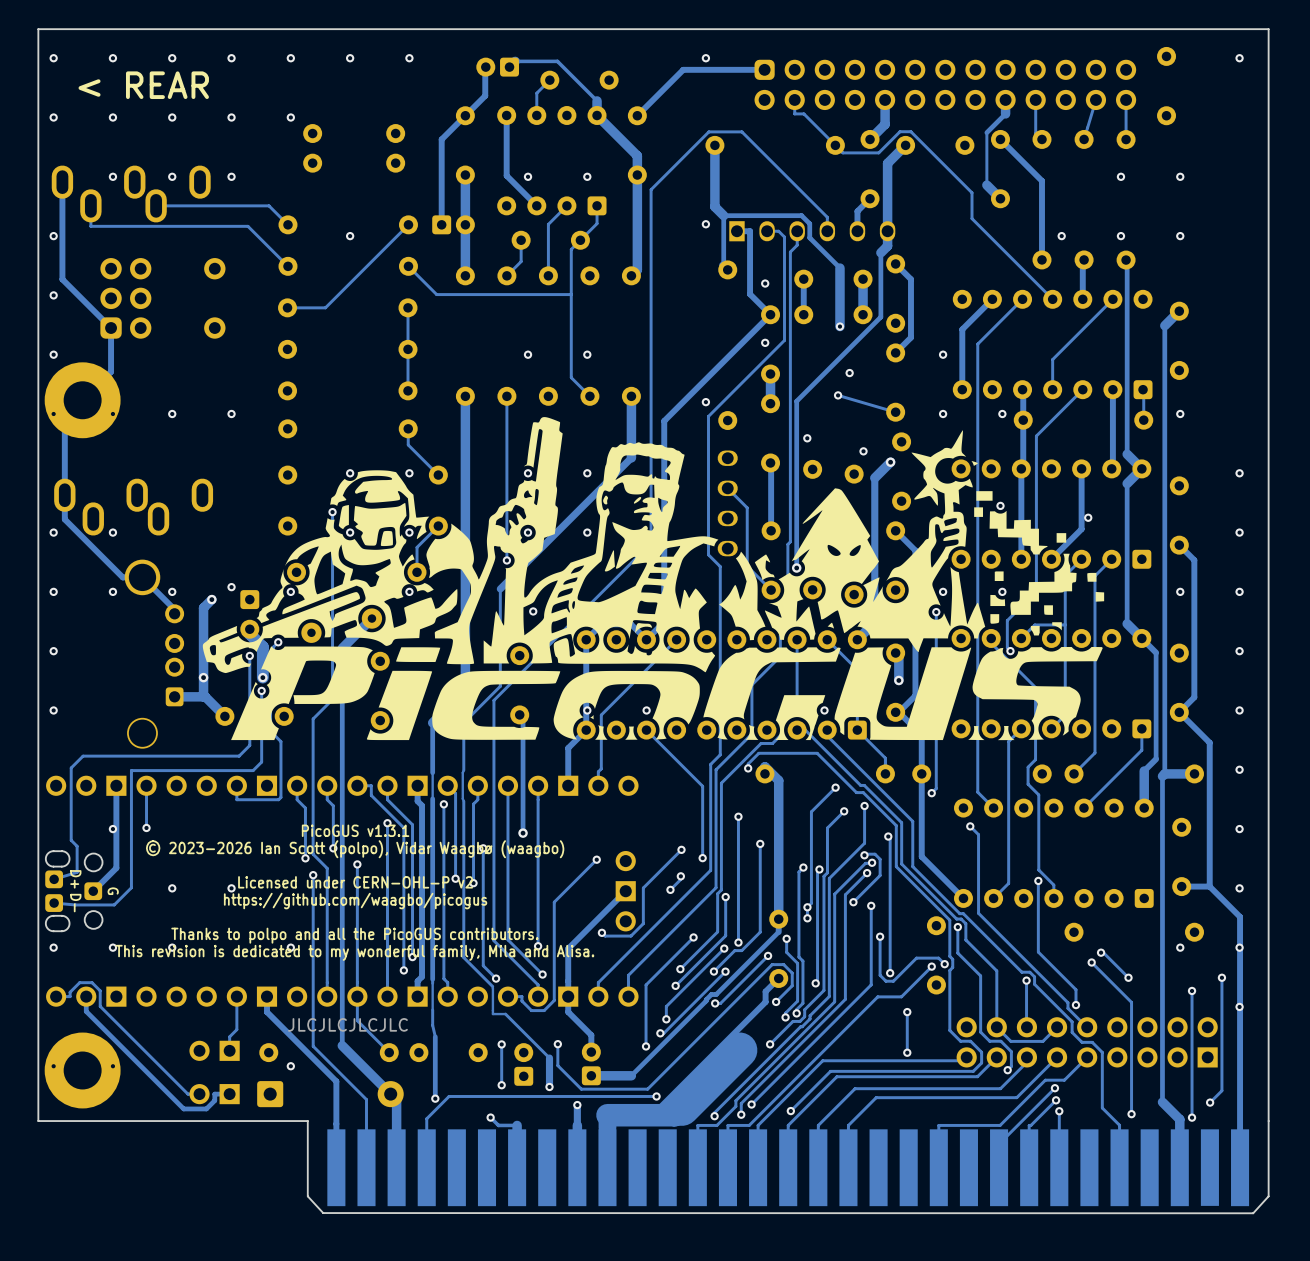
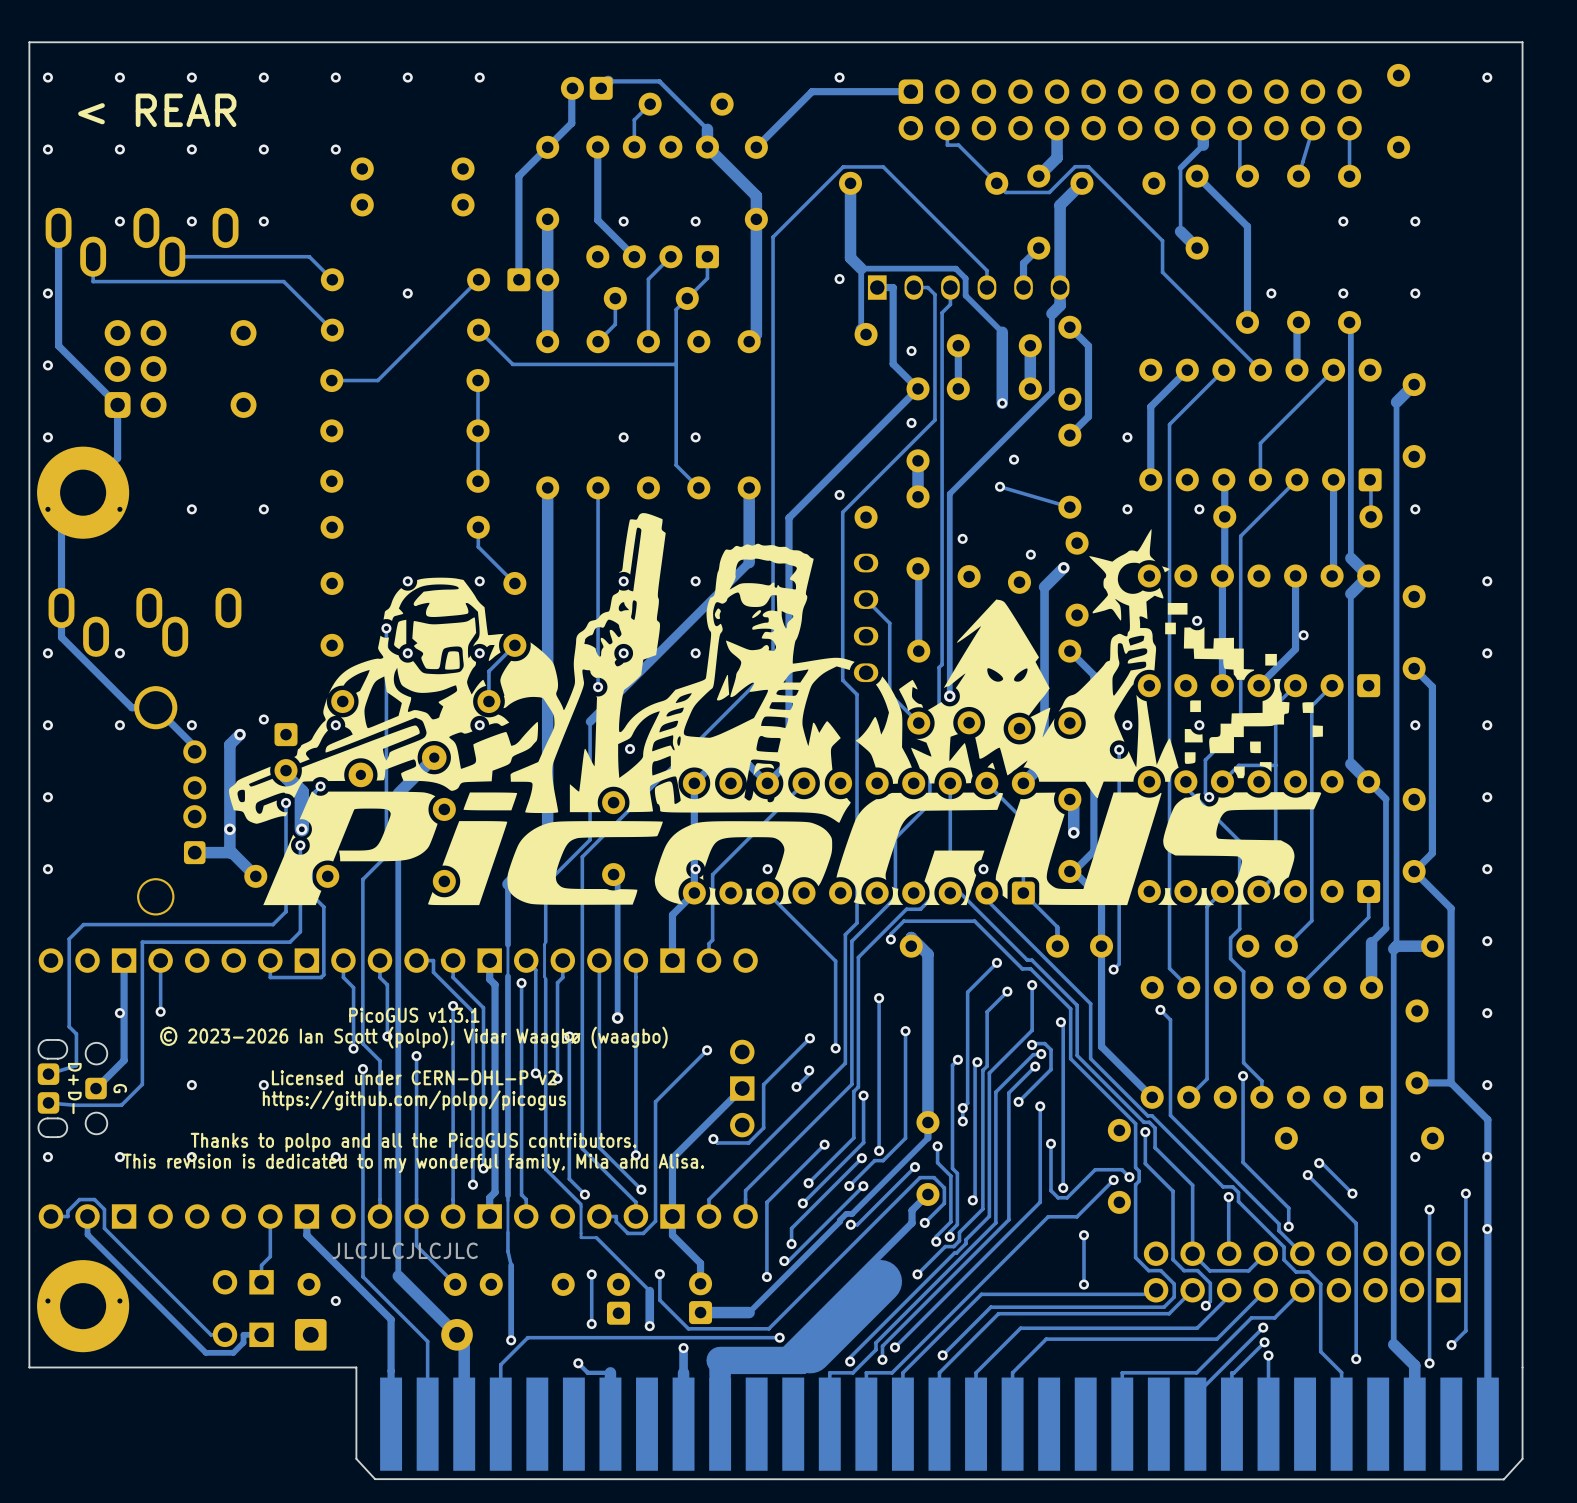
text: https://github.com/waagbo/picogus (355, 901) -> https://github.com/polpo/picogus (414, 1100)

